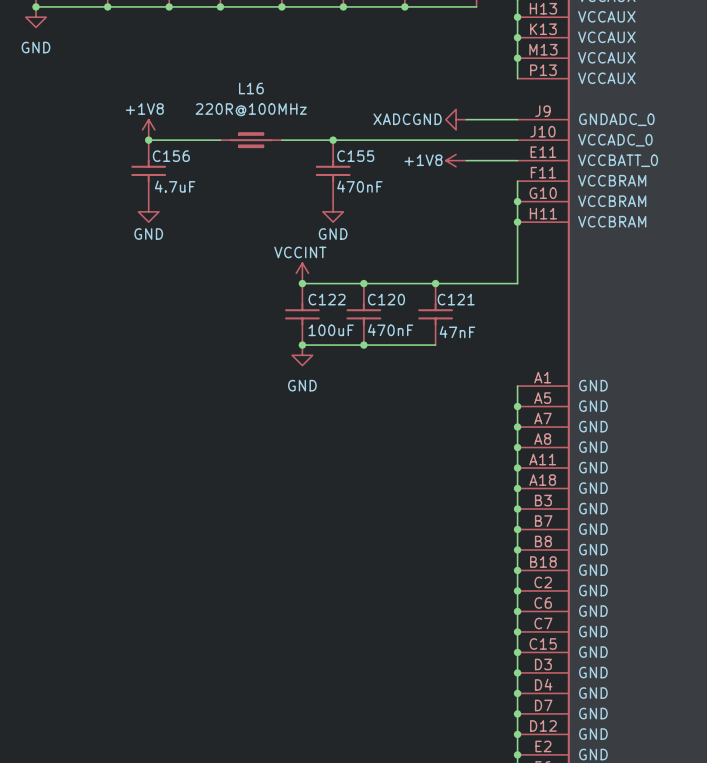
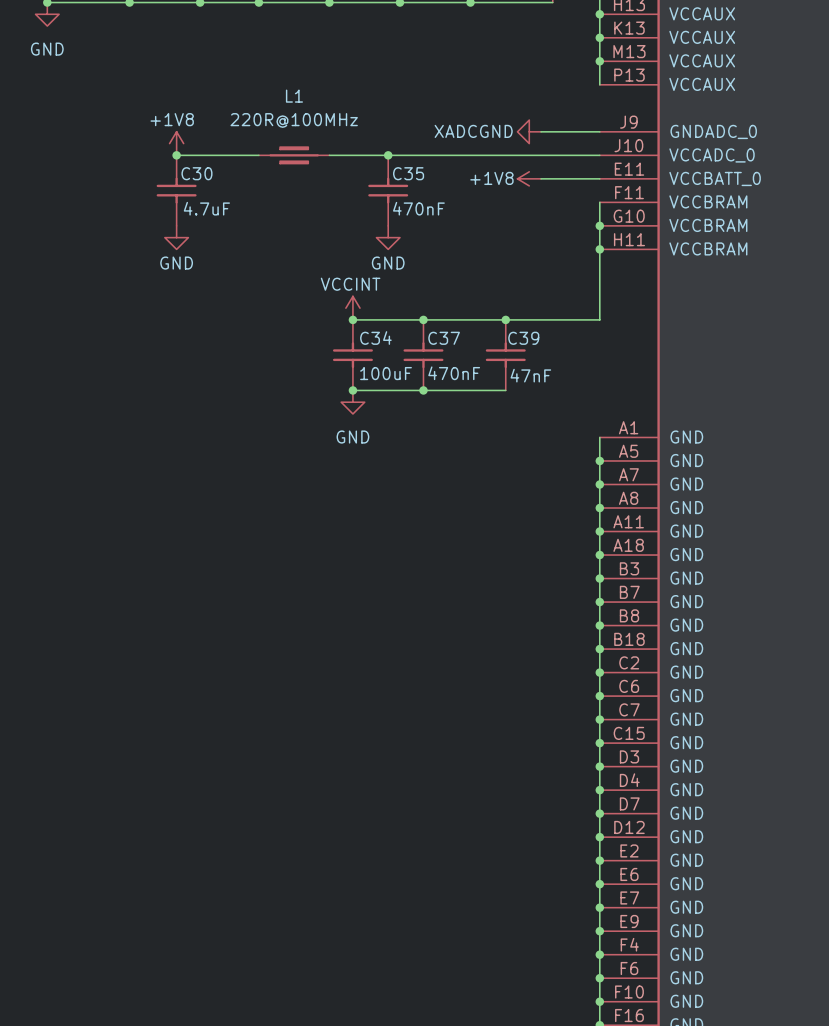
L16 name: L16 (251, 88) -> L1 (294, 96)
C156 name: C156 (171, 156) -> C30 (196, 173)
C155 name: C155 (355, 156) -> C35 (408, 173)
C122 name: C122 (327, 299) -> C34 (375, 338)
C120 name: C120 (386, 299) -> C37 (444, 338)
C121 name: C121 (456, 299) -> C39 (523, 338)

